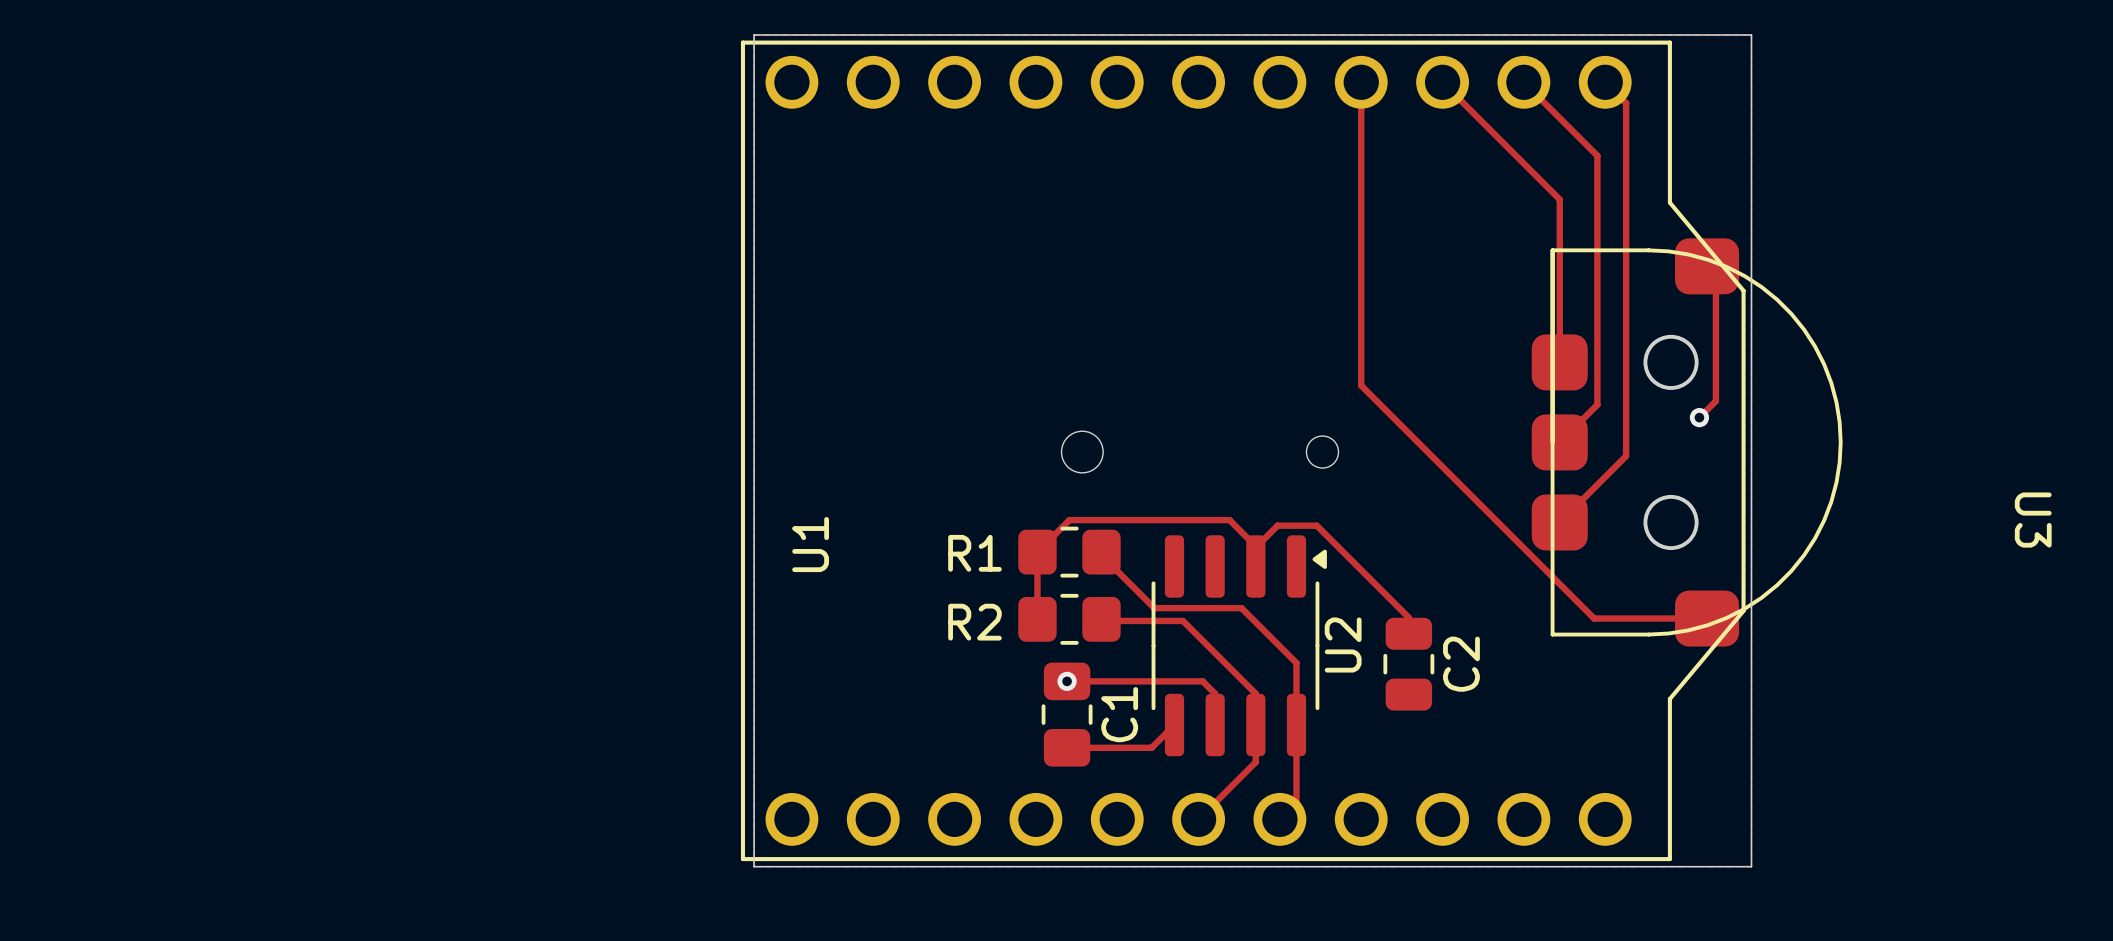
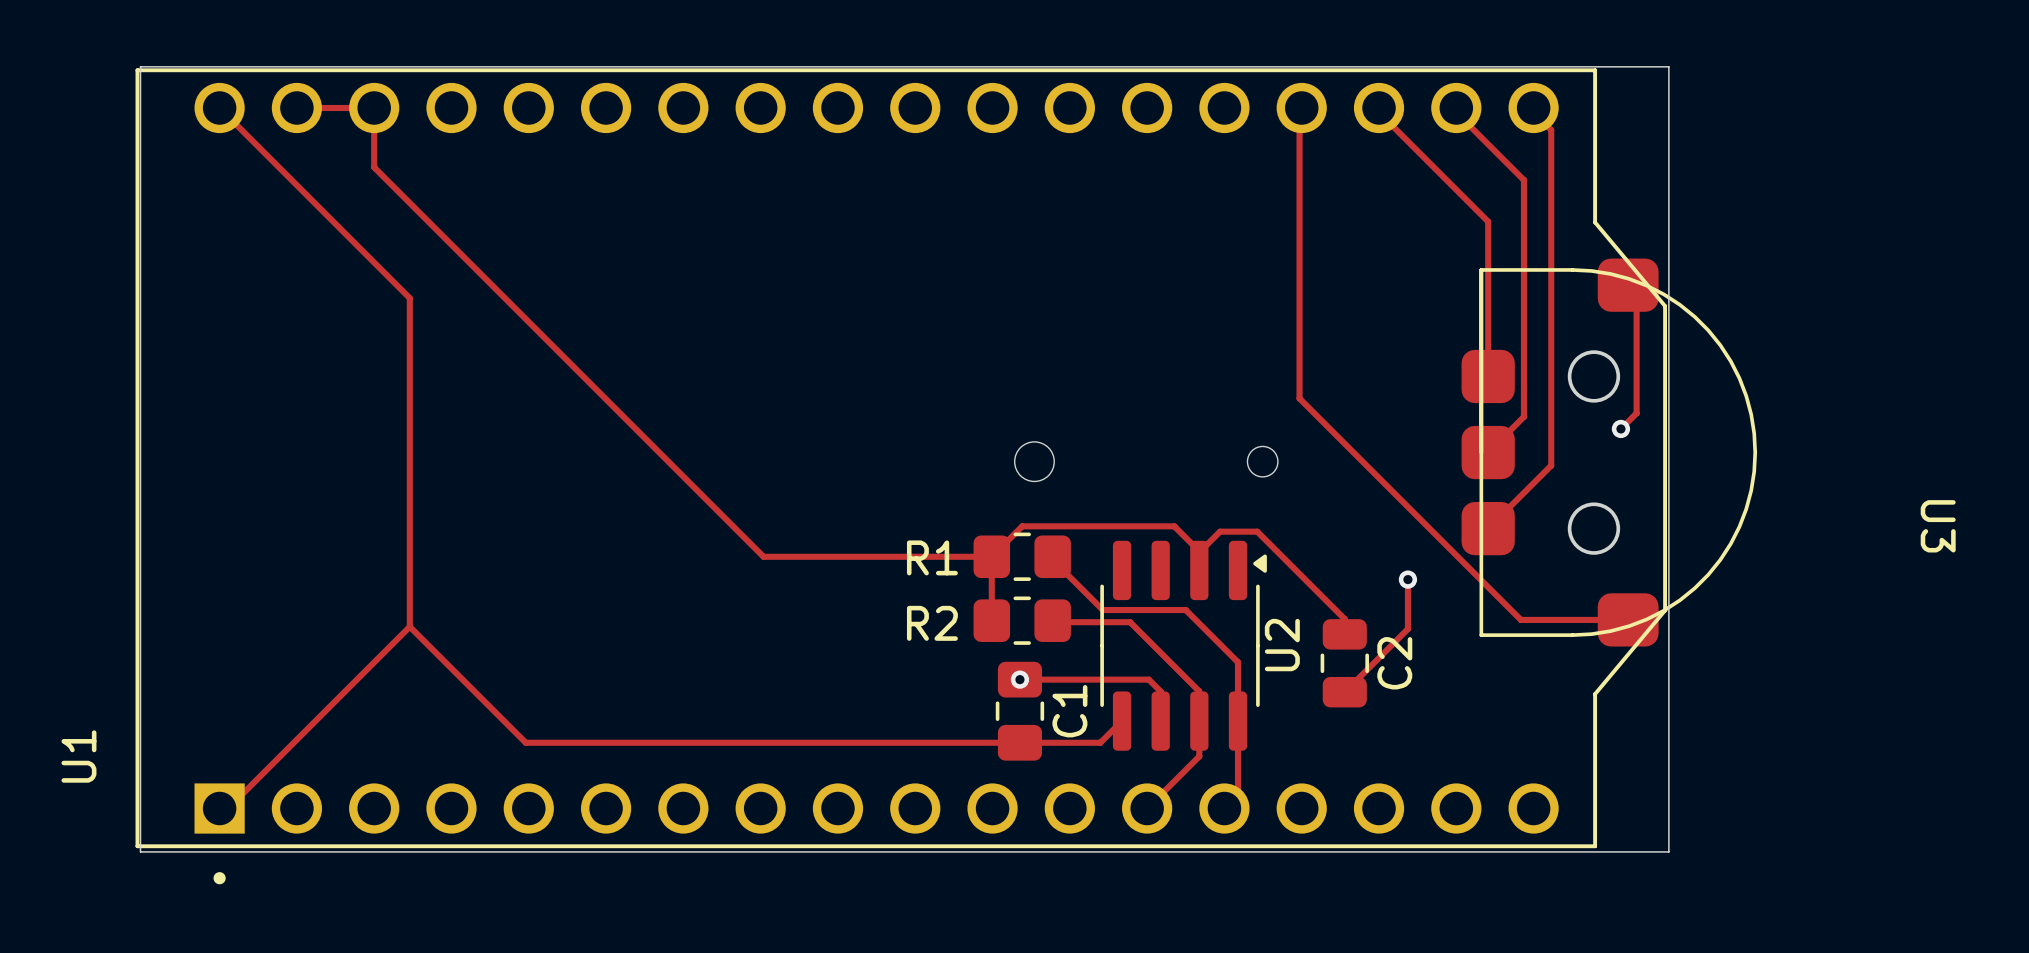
board edge: (754, 34) (1751, 34) (1751, 866) (754, 866) (754, 34) -> (140, 66) (140, 851) (1668, 851) (1668, 66) (140, 66)
U1 footprint: [740, 40, 1746, 862] -> [135, 68, 1668, 885]
track: none -> (219, 107) (409, 298) (409, 626)
track: none -> (296, 107) (374, 107) (374, 167) (763, 556) (991, 556)
U1 name position: U1 (810, 544) -> U1 (78, 756)
track: none -> (1407, 579) (1407, 629) (1344, 692)
via: none -> (1407, 579)
track: none -> (409, 626) (525, 742) (1019, 742)
track: none -> (409, 626) (228, 808) (219, 808)

